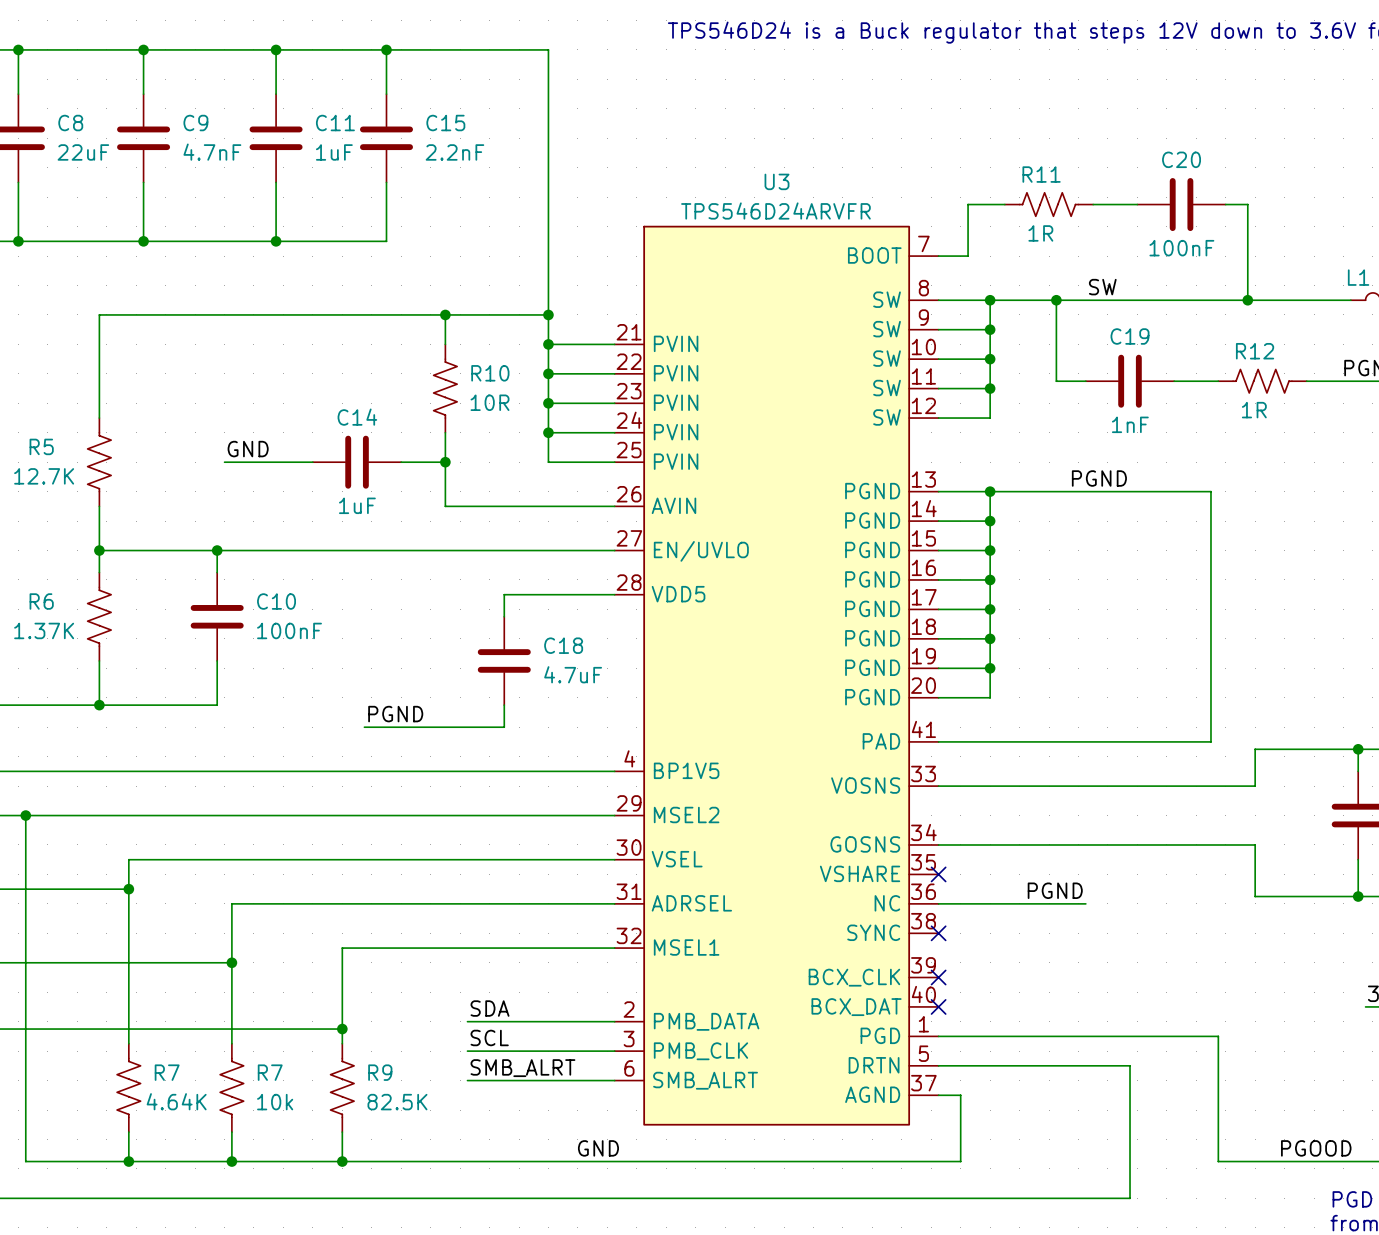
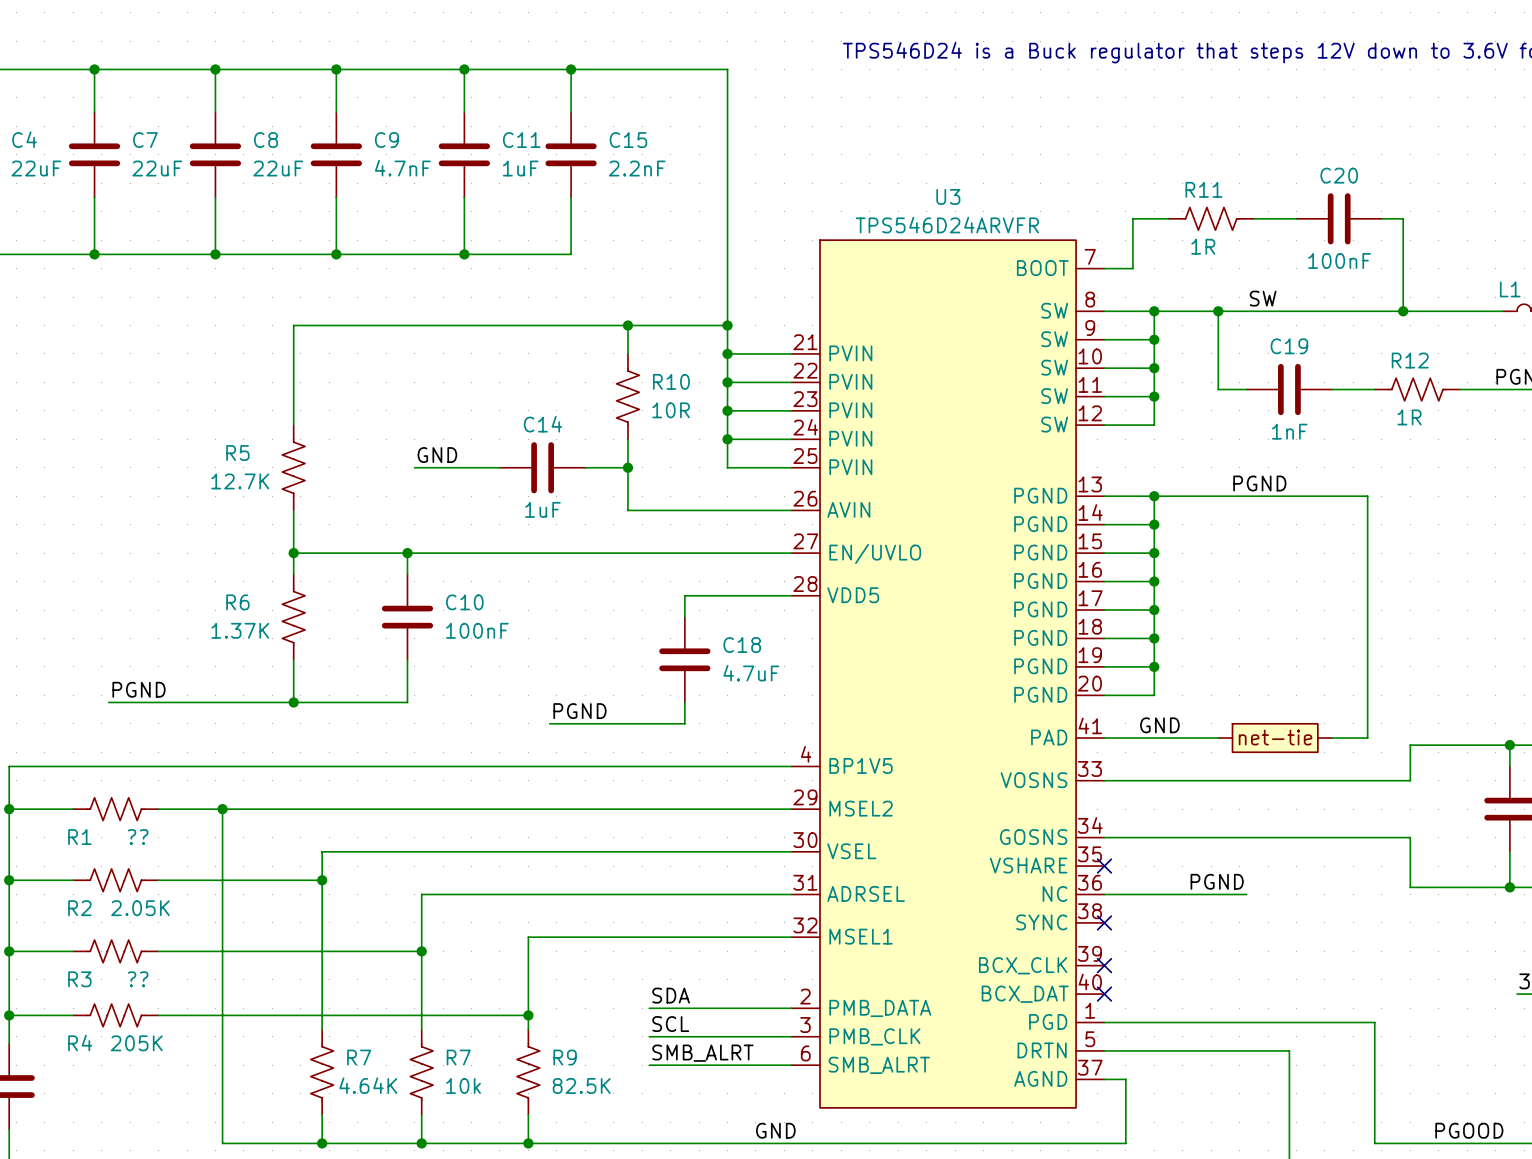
label: none -> GND (1159, 725)
part: none -> (1275, 738)

